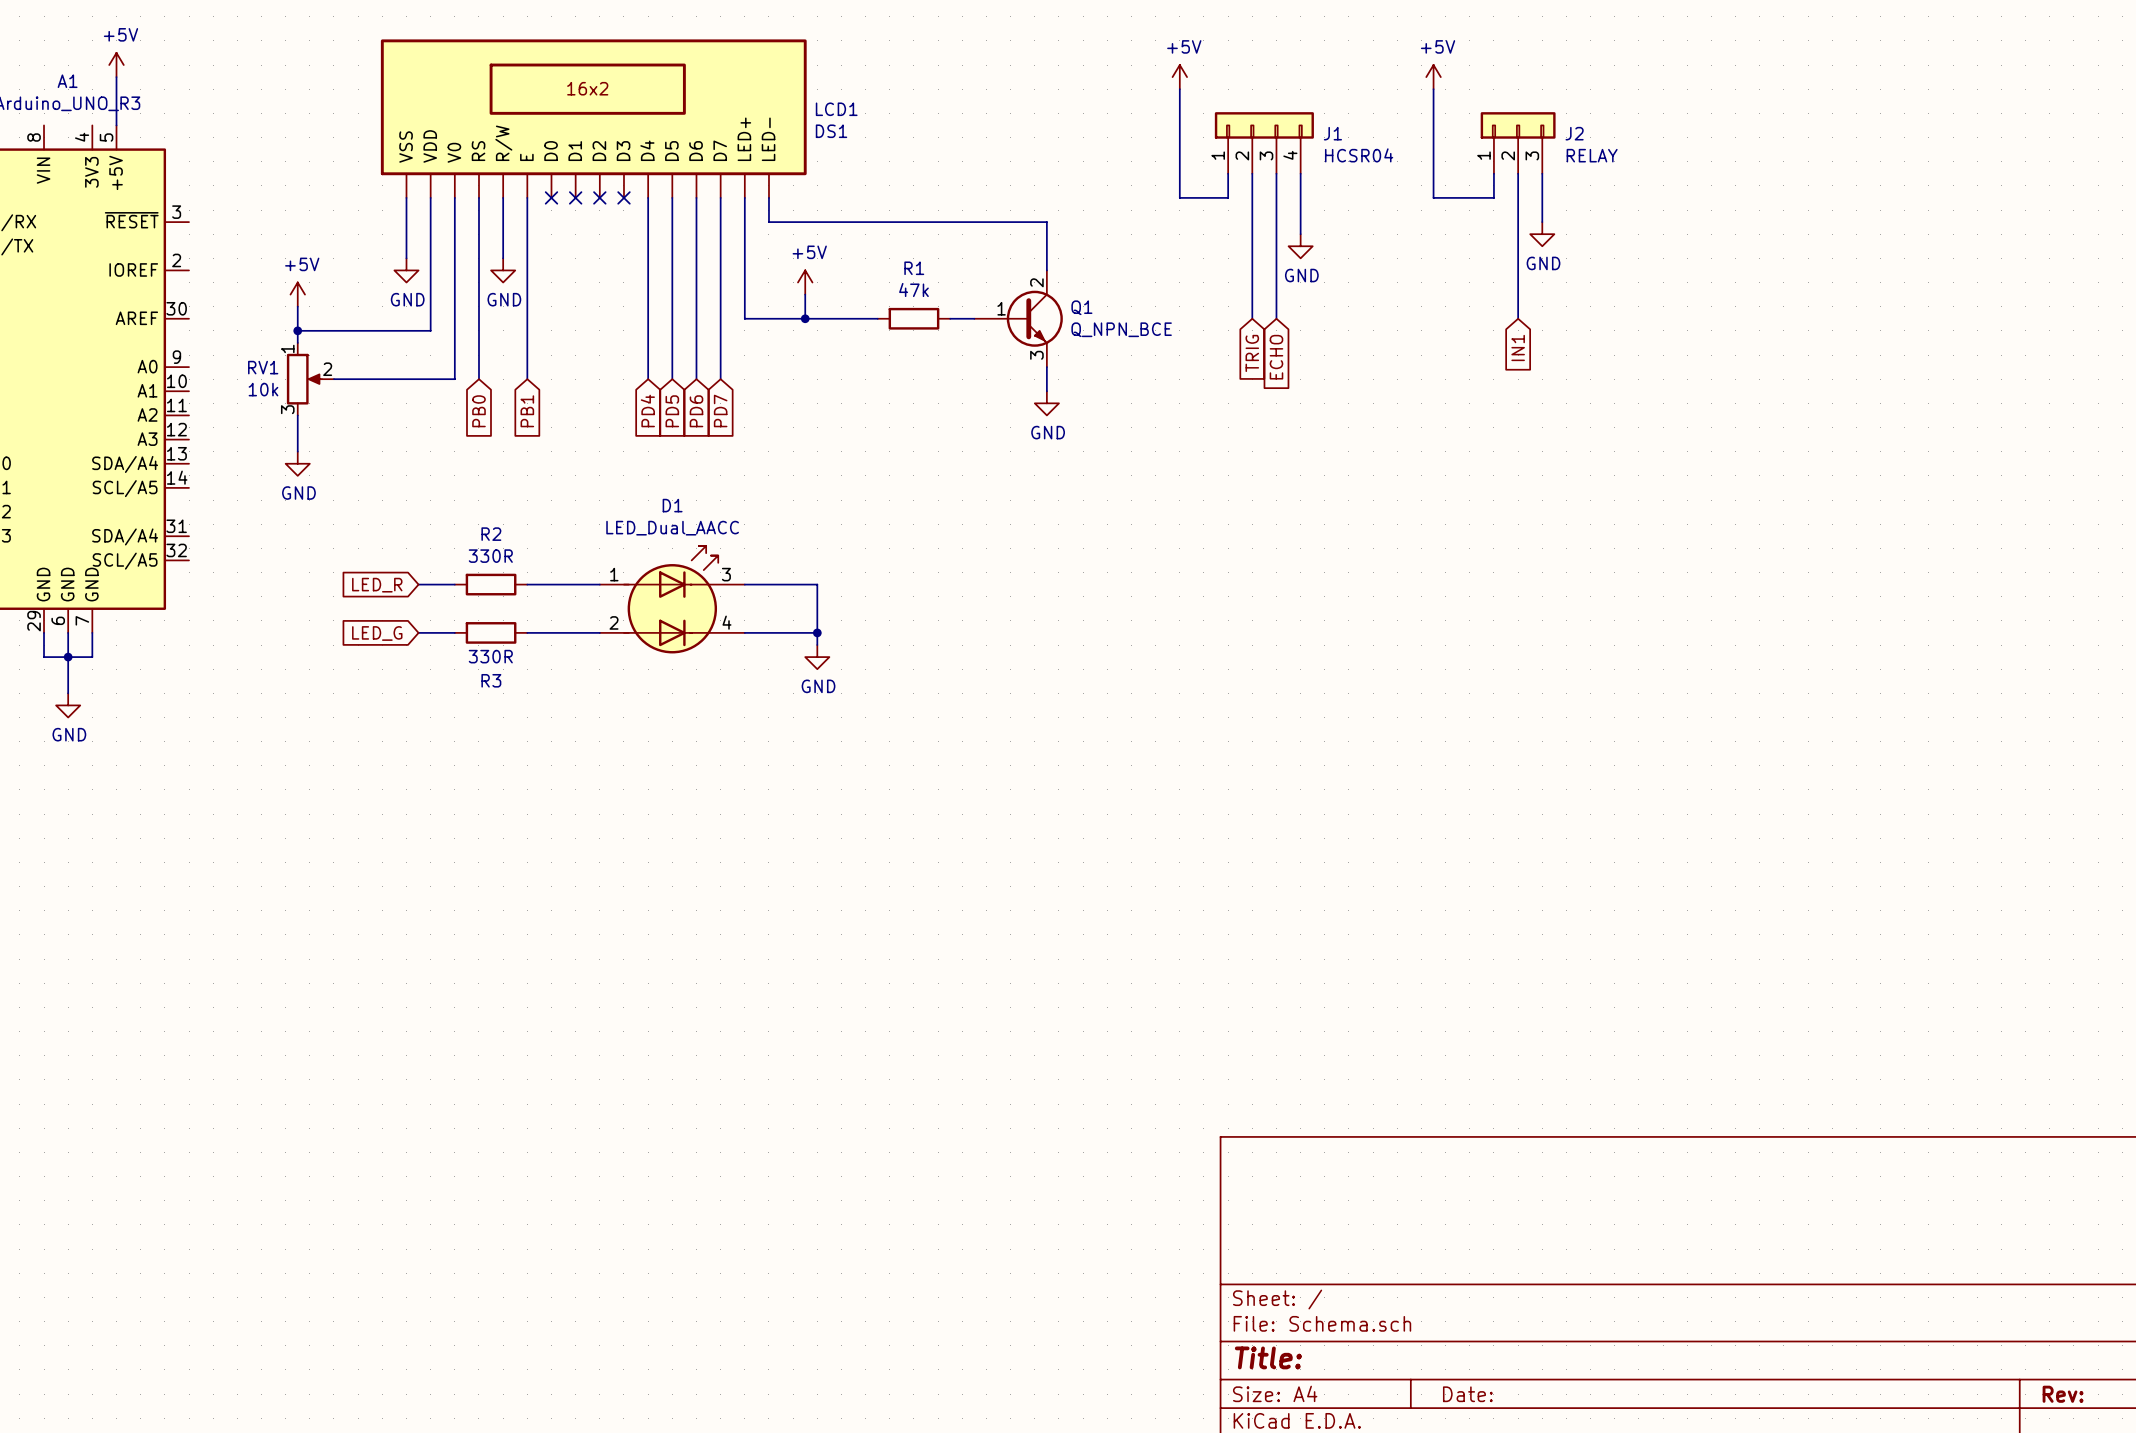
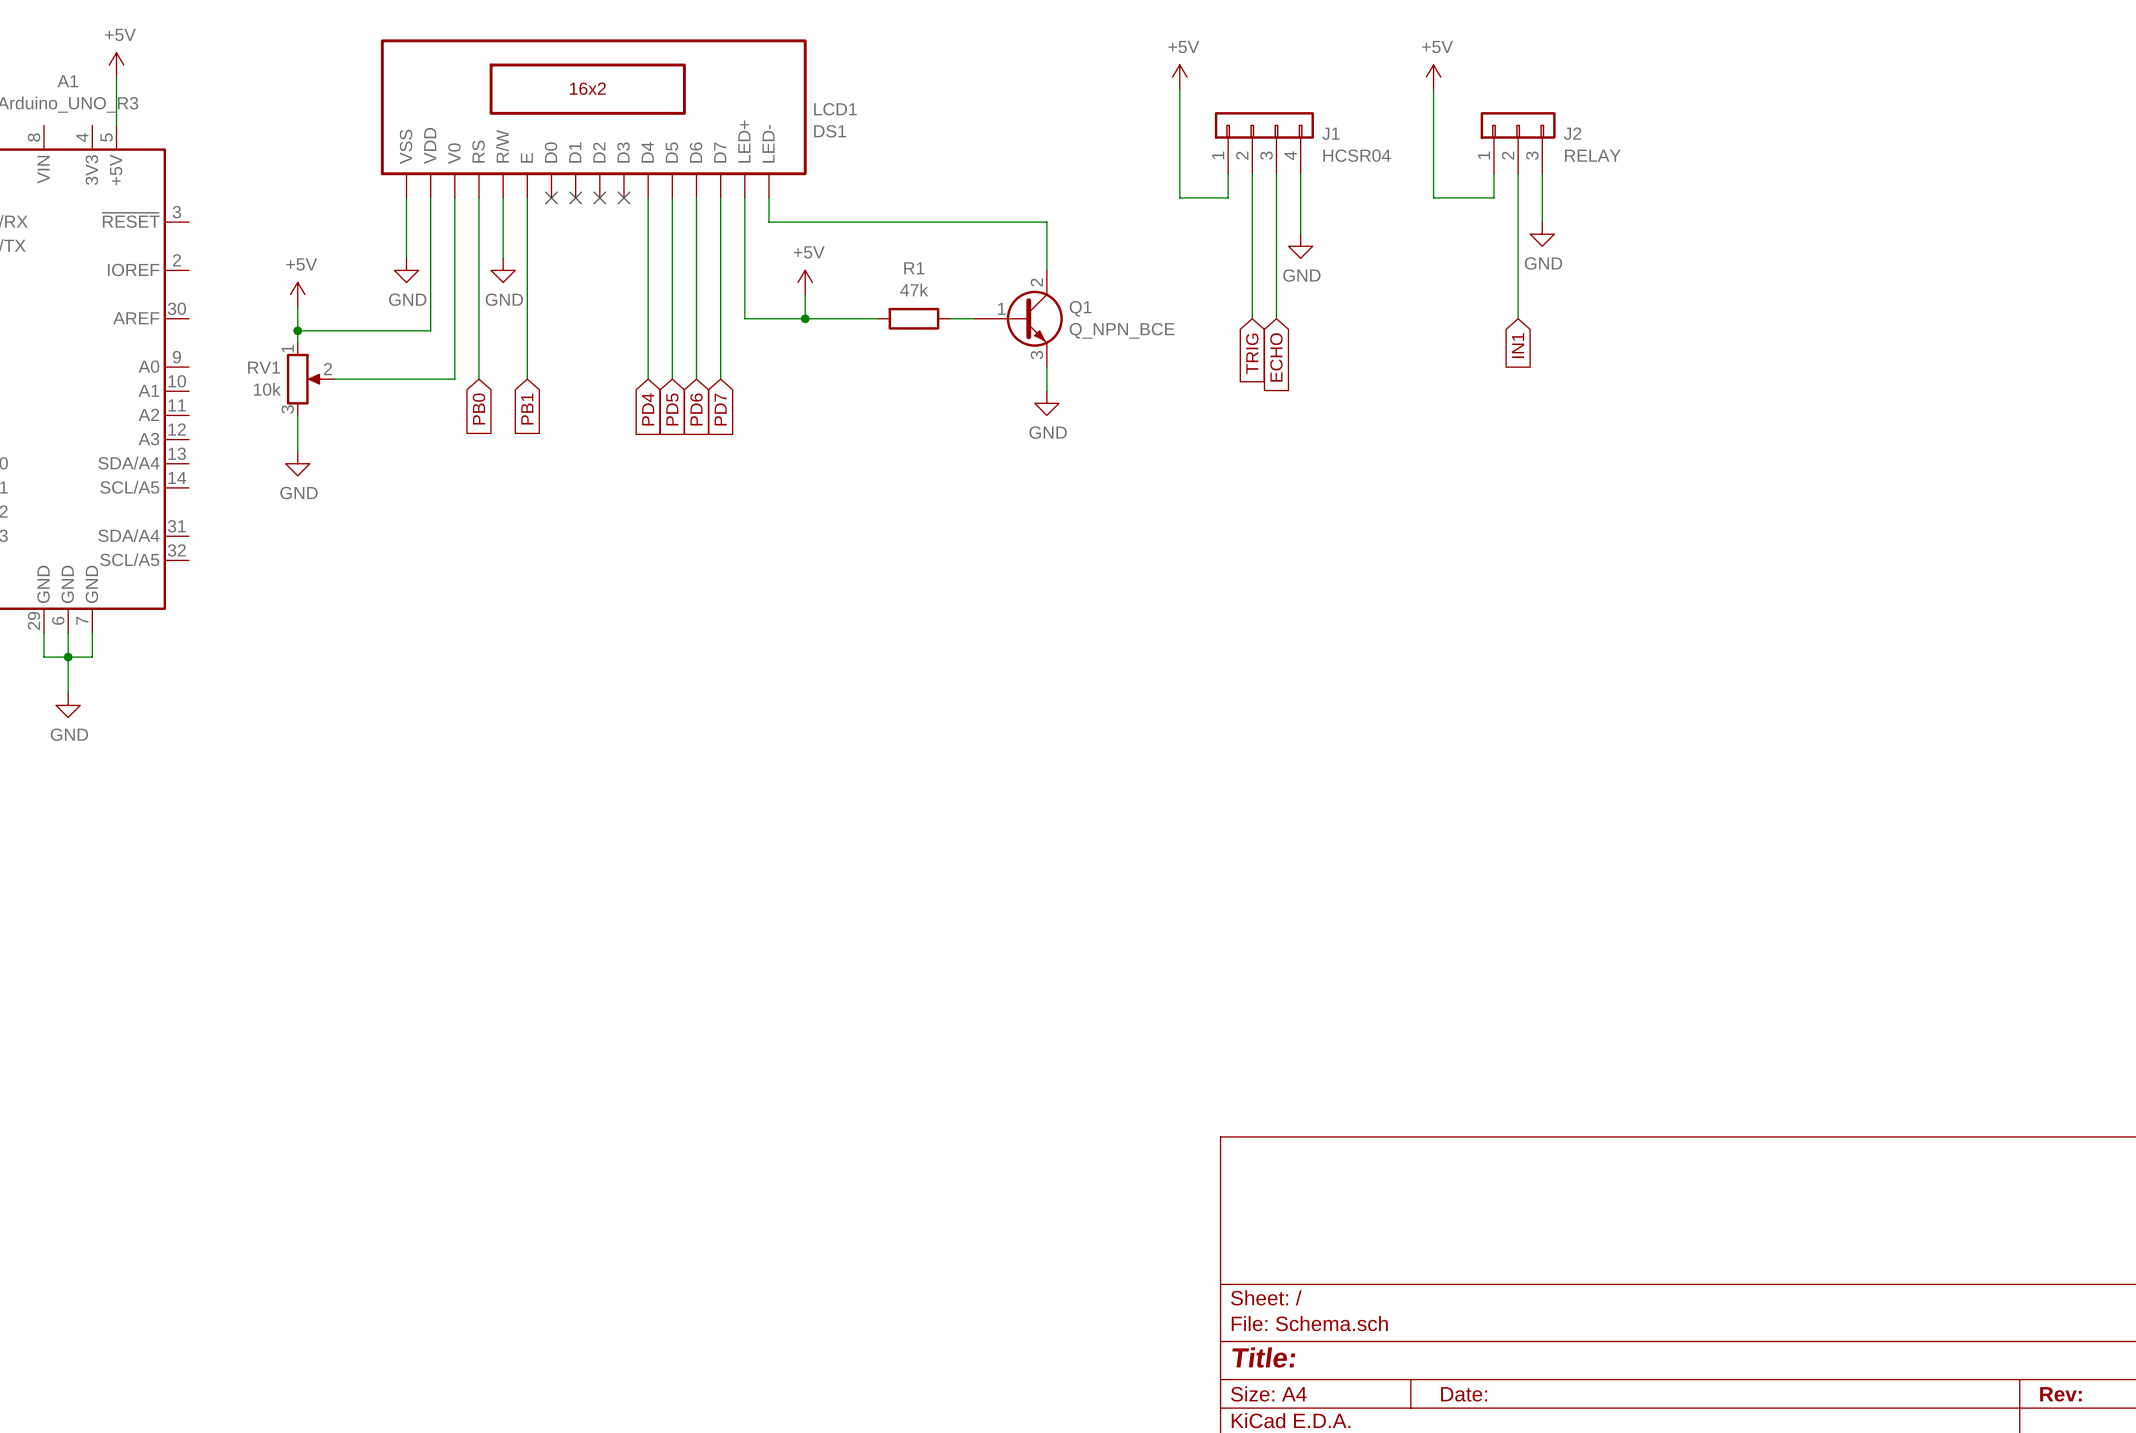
wire: (418, 584) (454, 584) -> none
R2: 330R (491, 584) -> none
wire: (527, 584) (599, 584) -> none
wire: (744, 584) (817, 584) (817, 645) -> none
global label: LED_R (377, 585) -> none
D1: LED_Dual_AACC (672, 599) -> none
wire: (418, 632) (454, 632) -> none
R3: 330R (491, 632) -> none
wire: (527, 632) (599, 632) -> none
wire: (744, 632) (817, 632) -> none
junction: (817, 632) -> none
global label: LED_G (377, 633) -> none
power symbol: GND (817, 657) -> none

